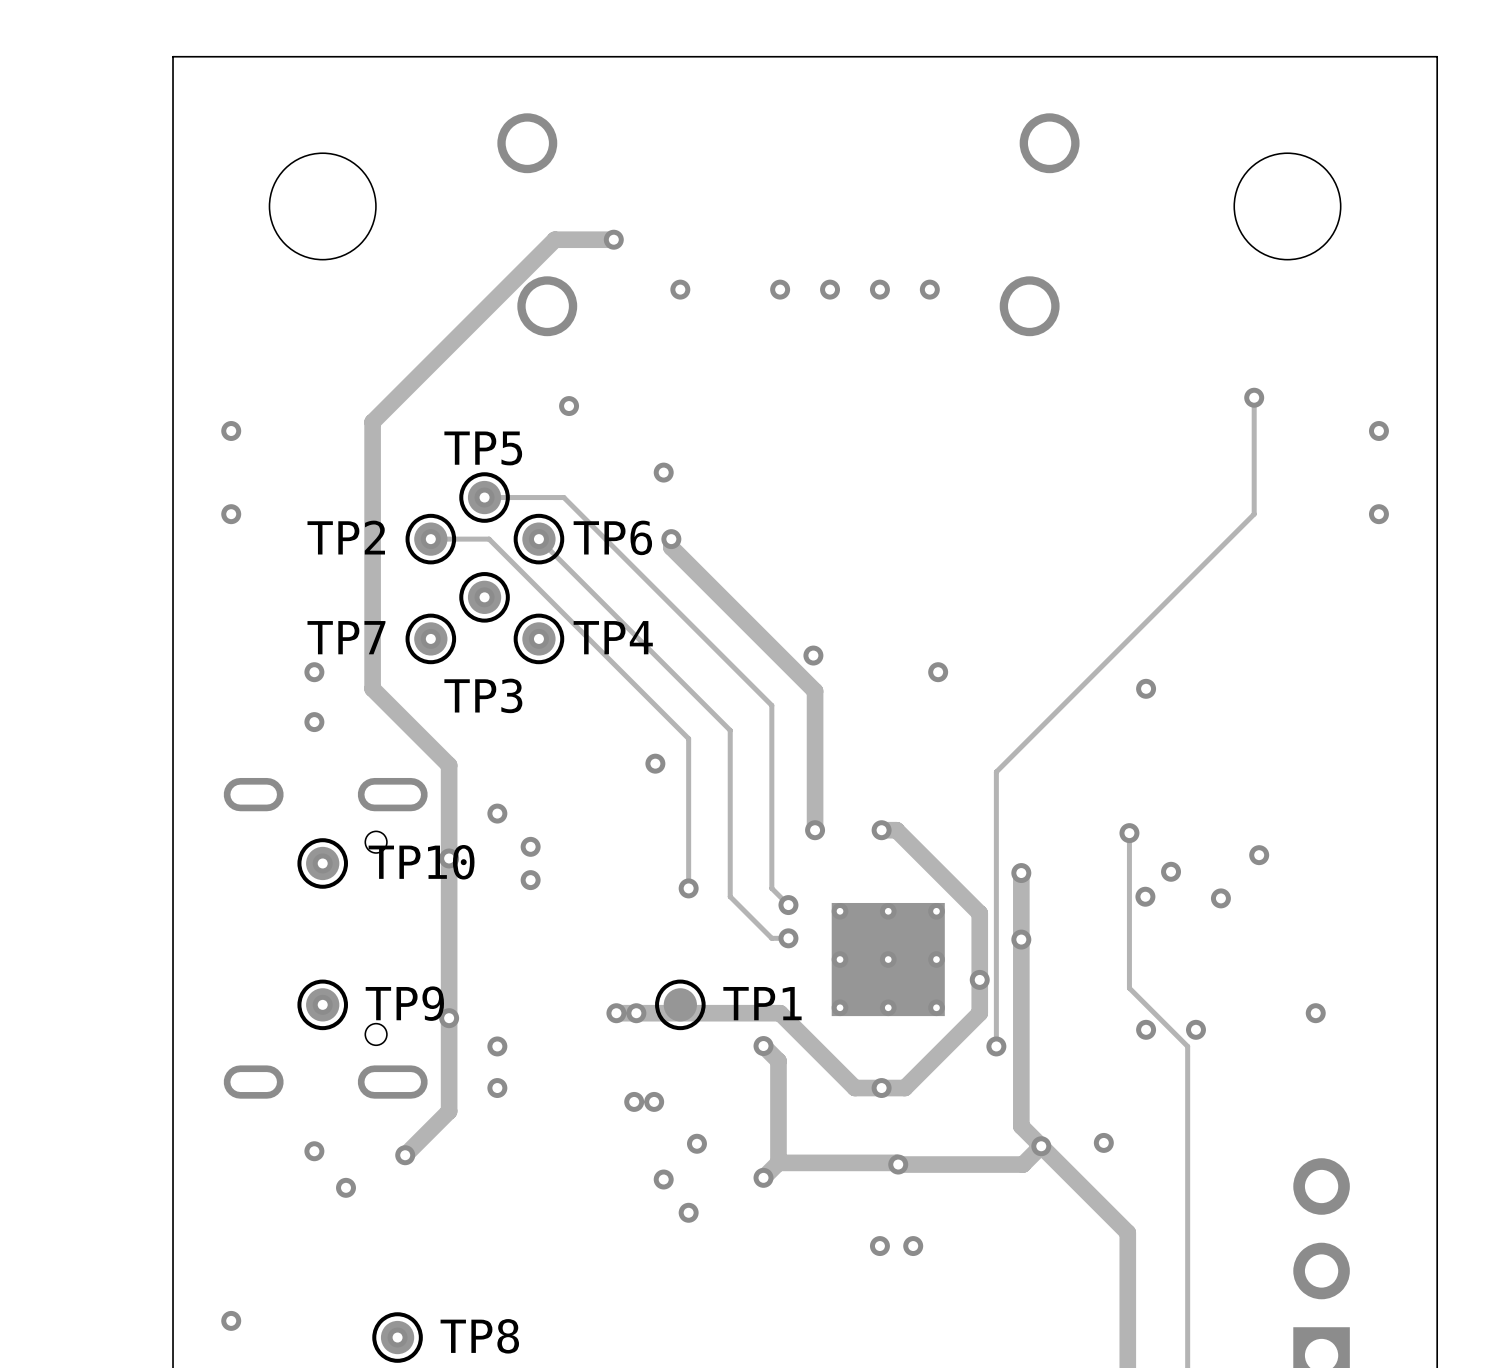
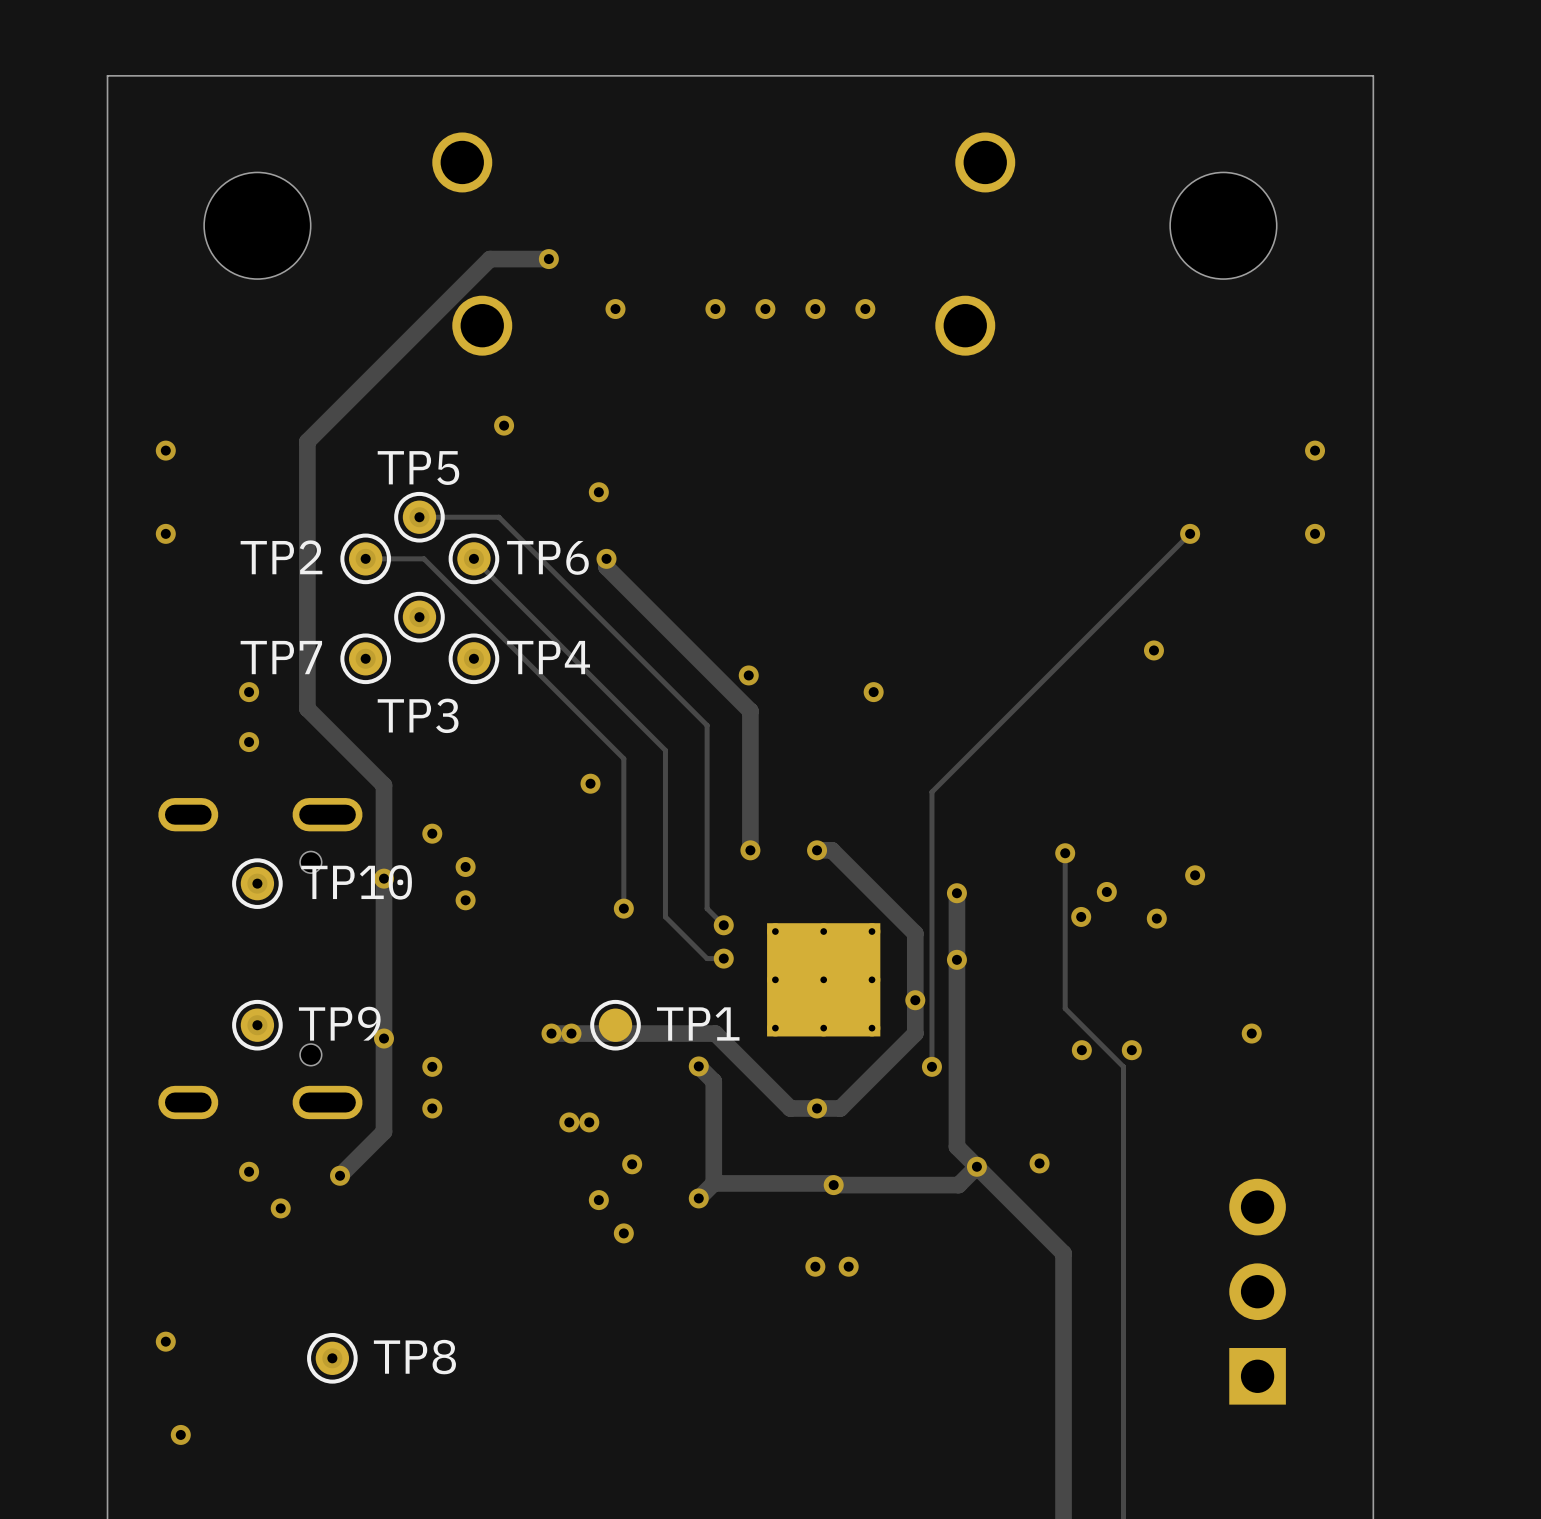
track: (1254, 397) (1254, 514) -> none
via: (1254, 397) -> none
via: none -> (1190, 533)
via position: (1146, 688) -> (1153, 650)

